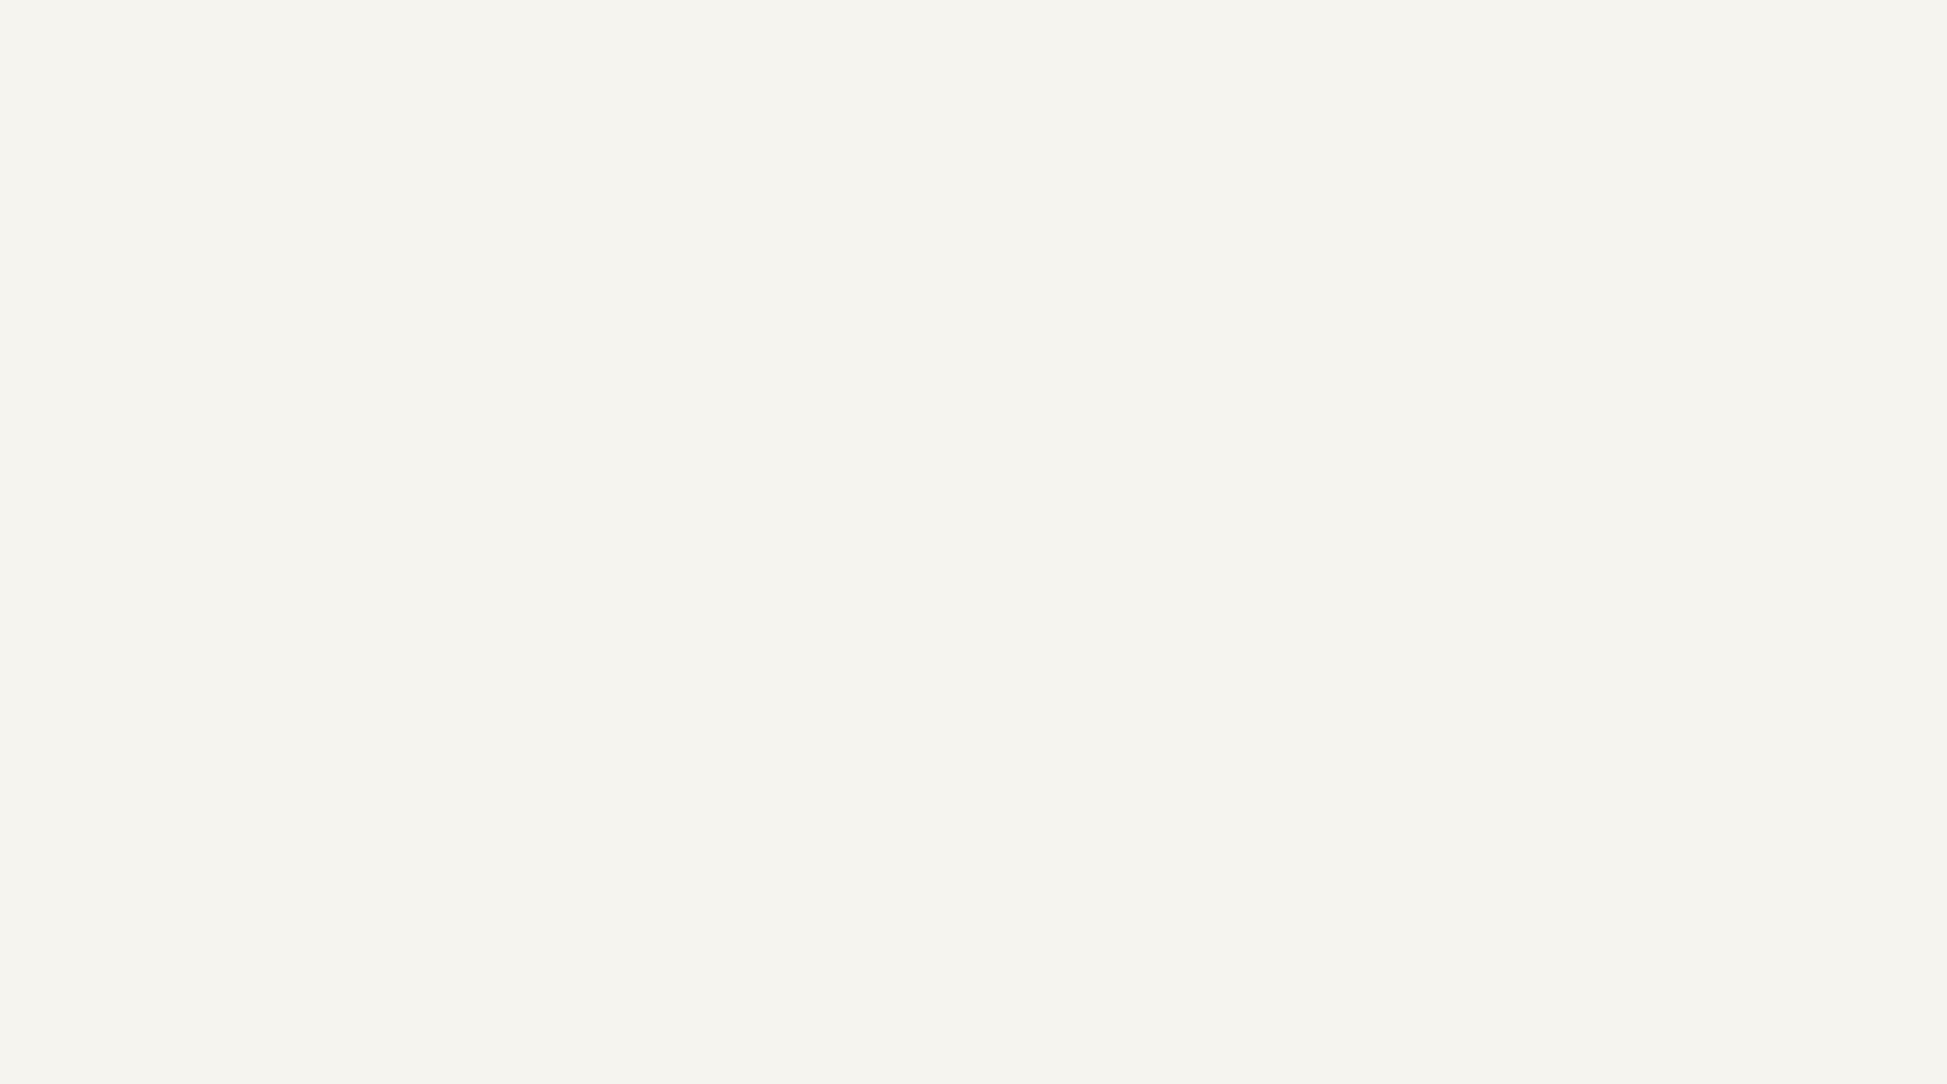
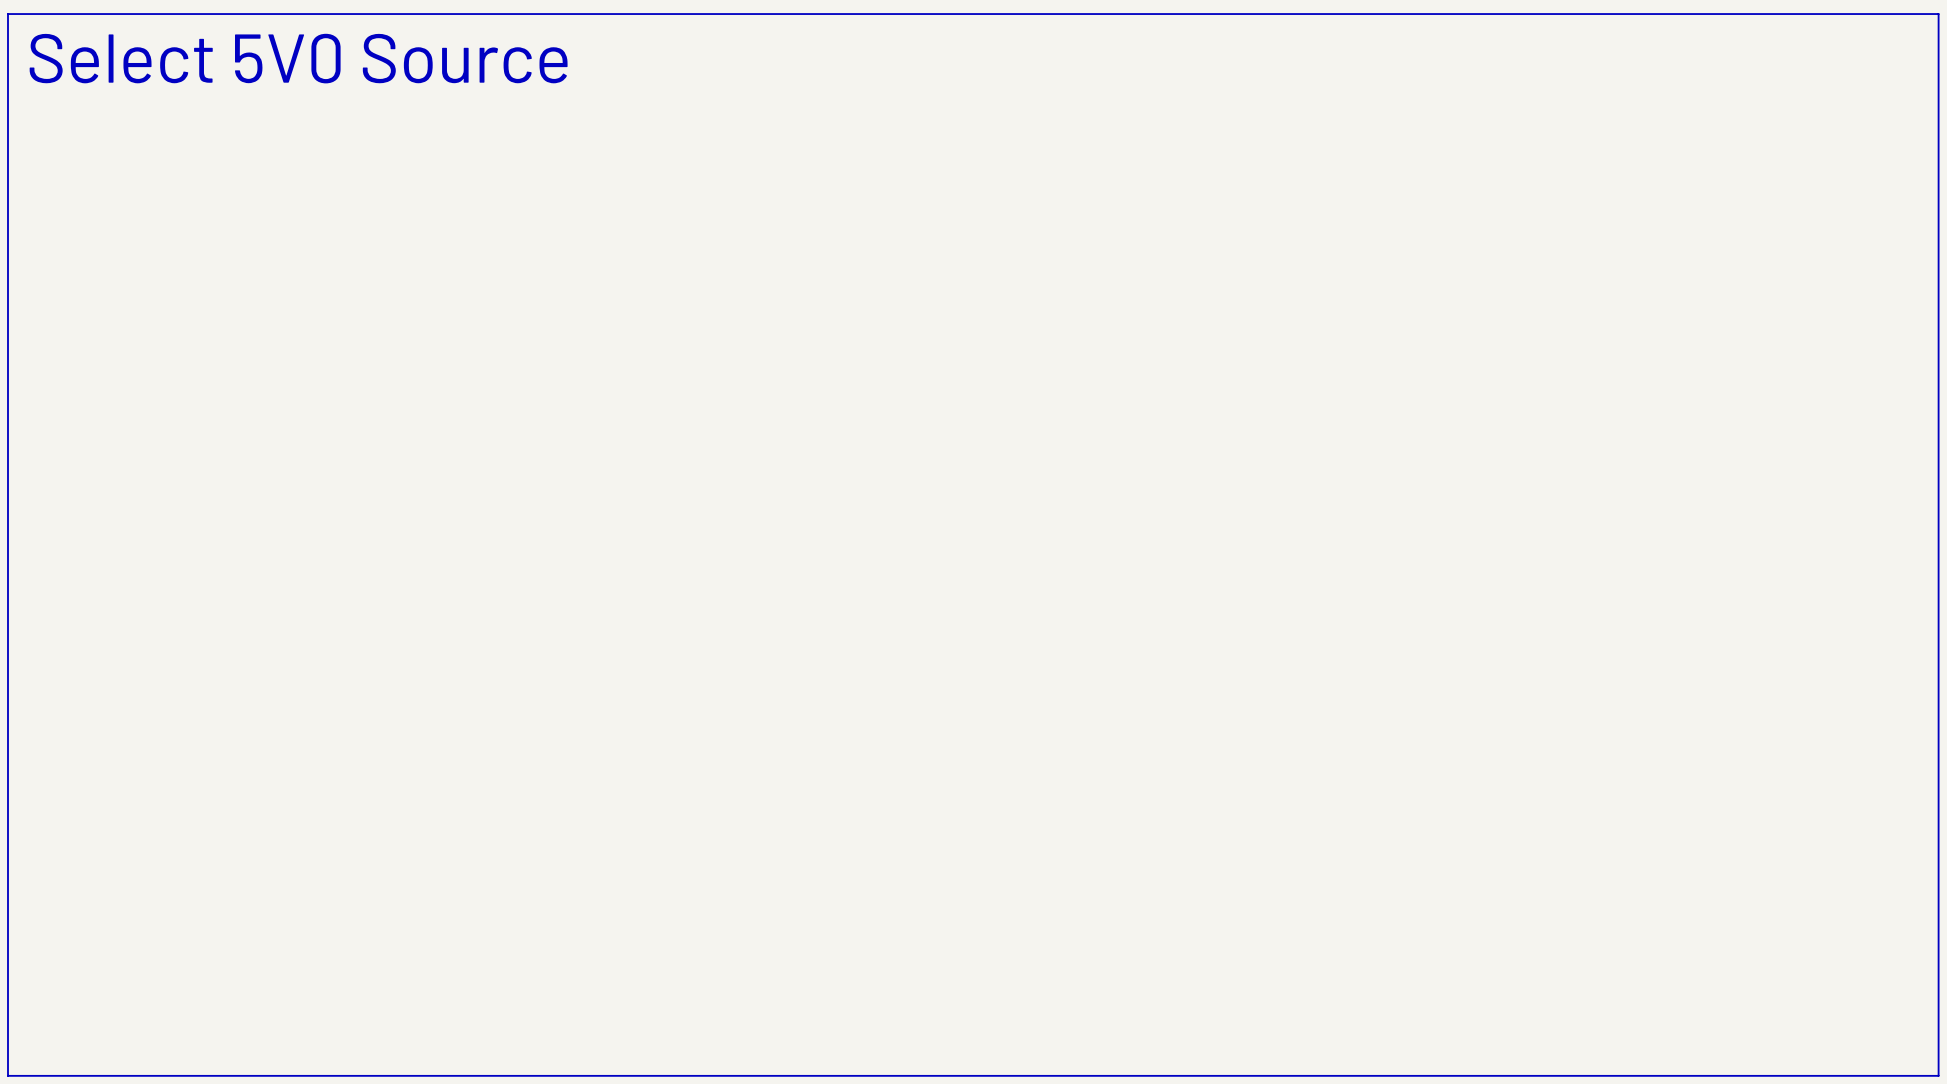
line: none -> (7, 14) (1938, 14) (1938, 1075) (7, 1075) (7, 14)
text: none -> Select 5V0 Source (298, 58)

